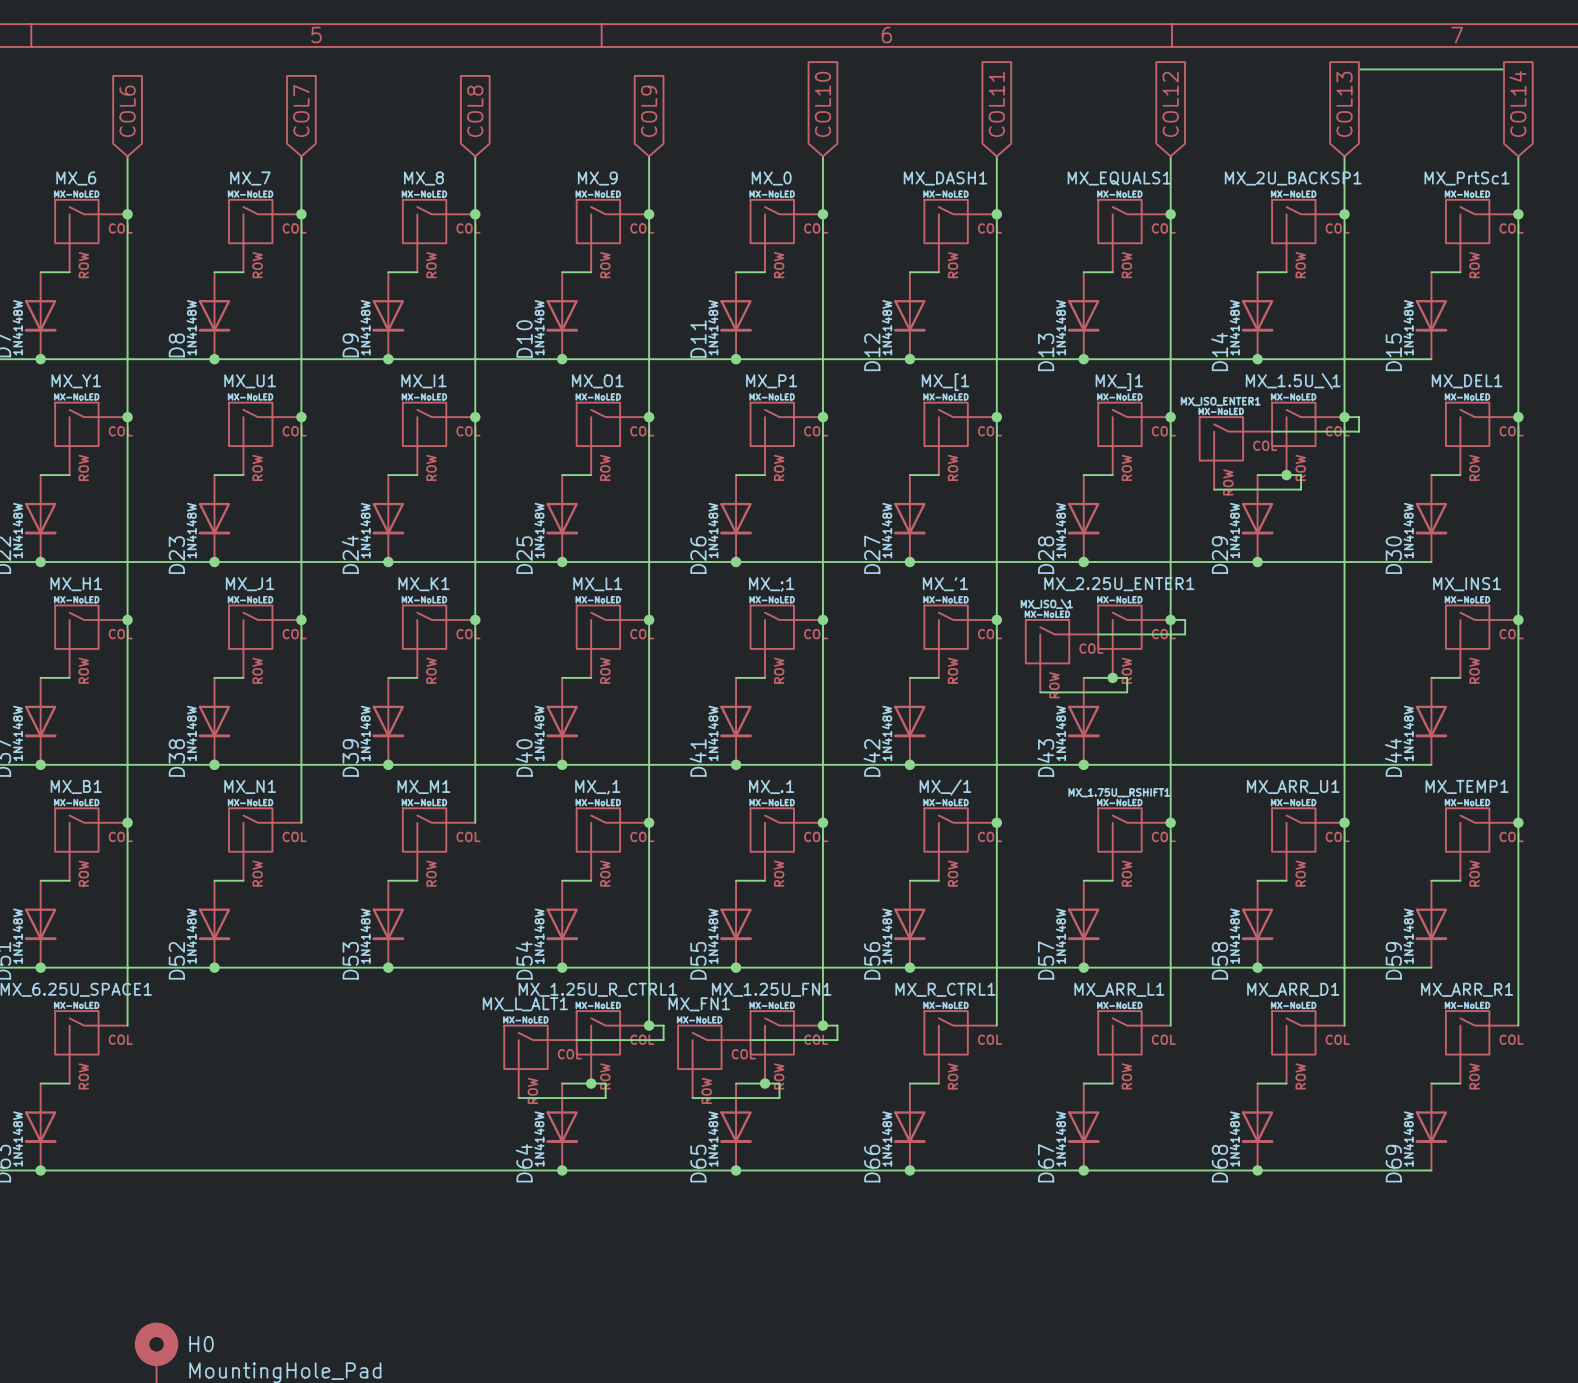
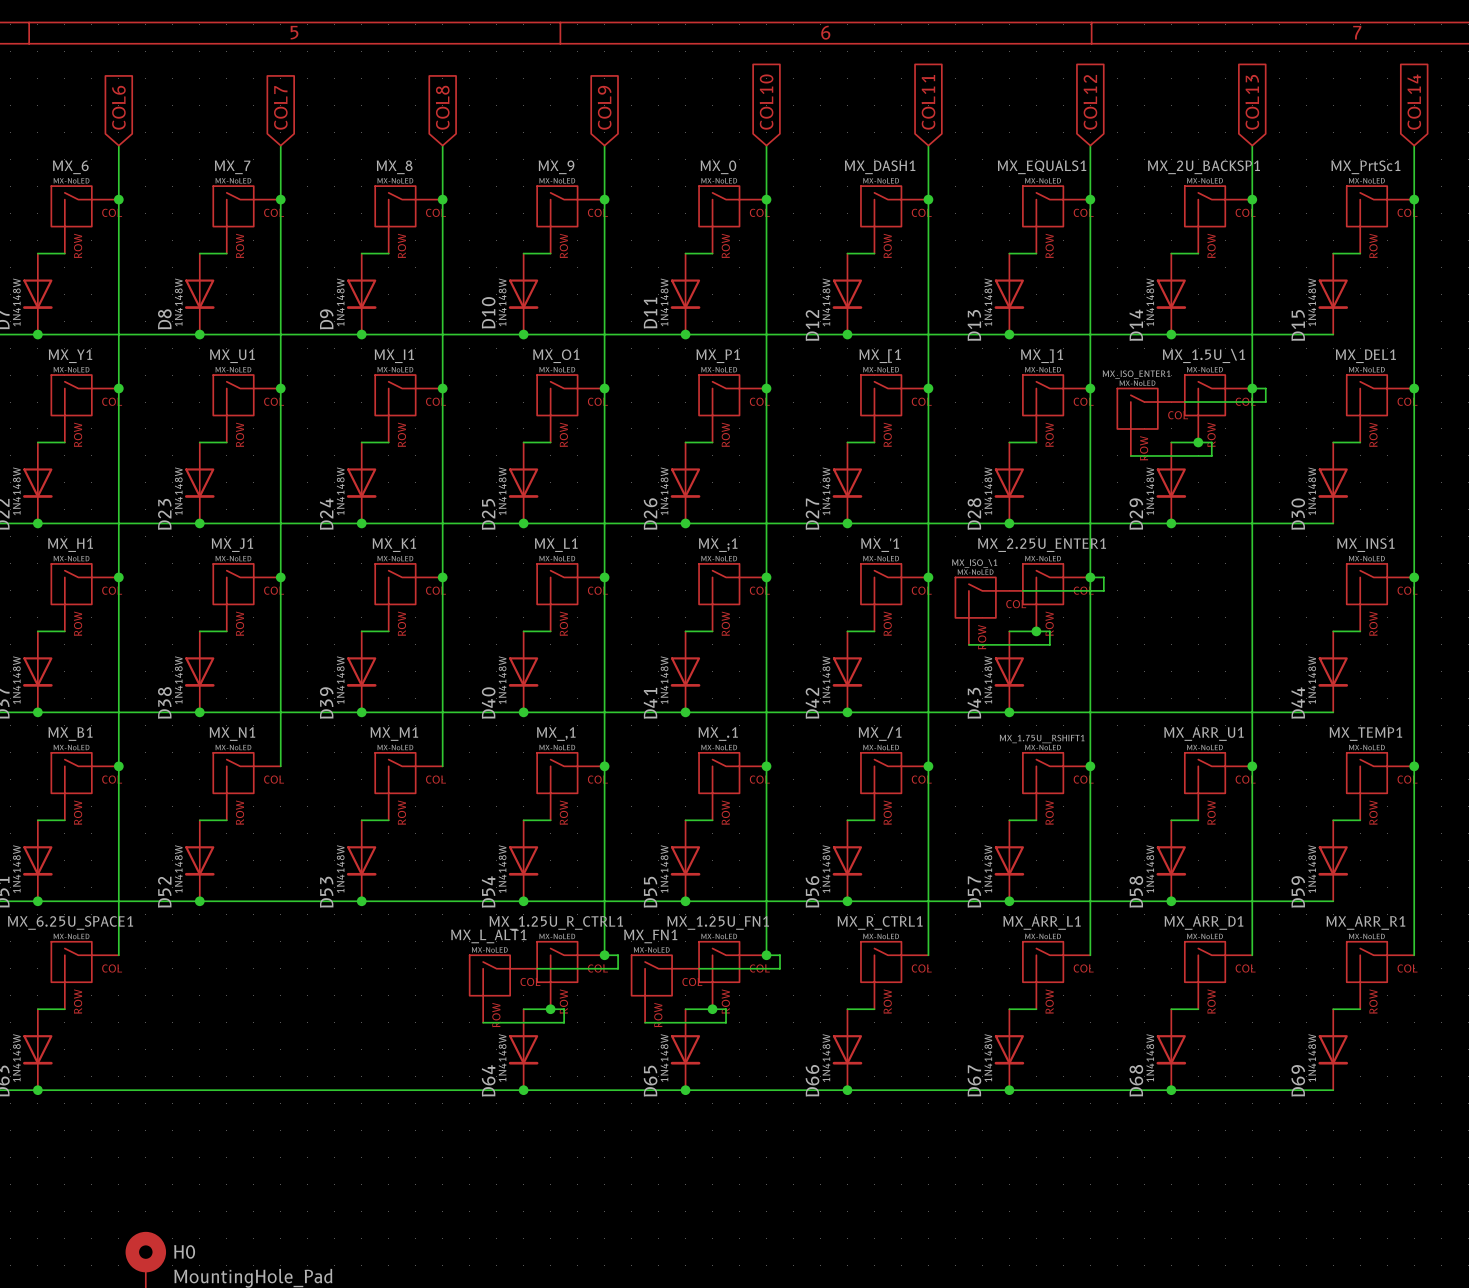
wire: (1359, 69) (1503, 69) -> none

